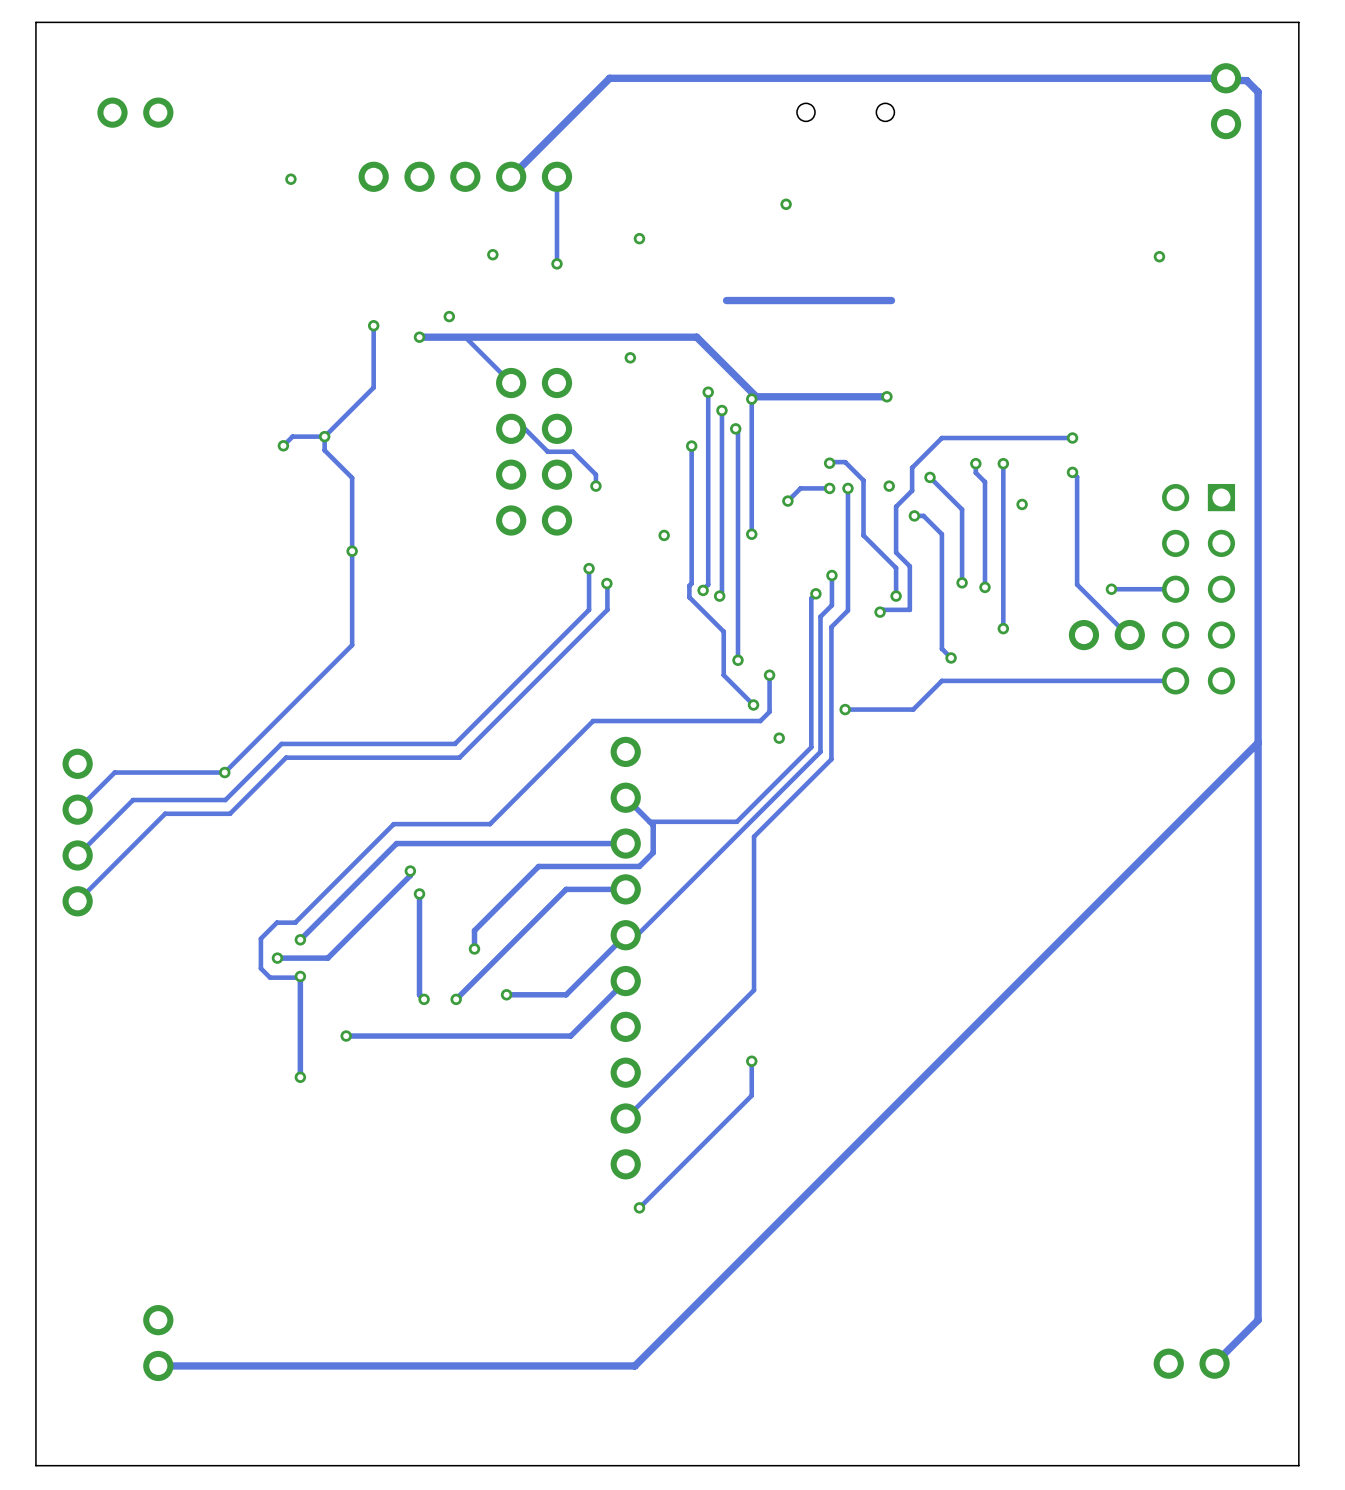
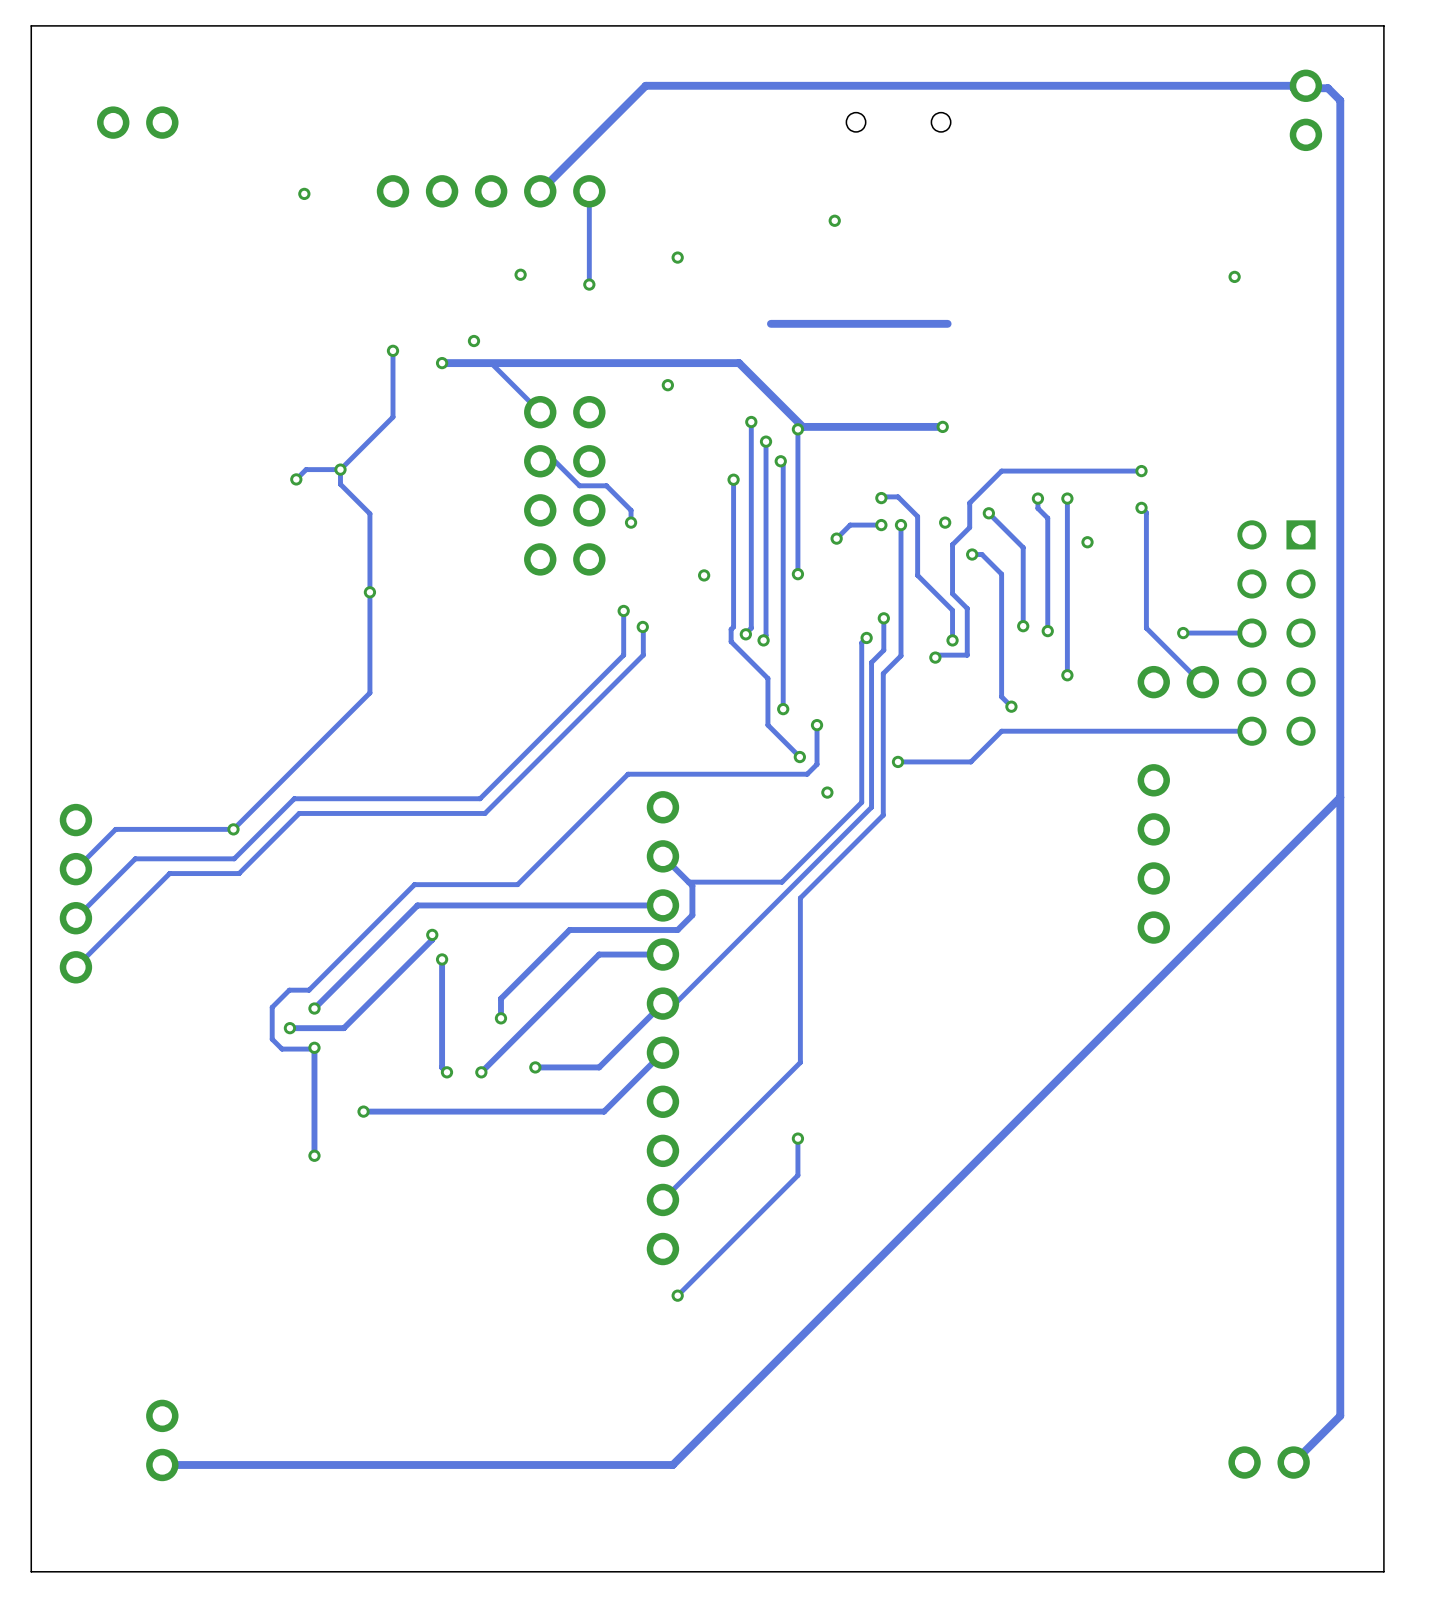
part: none -> (1153, 853)

